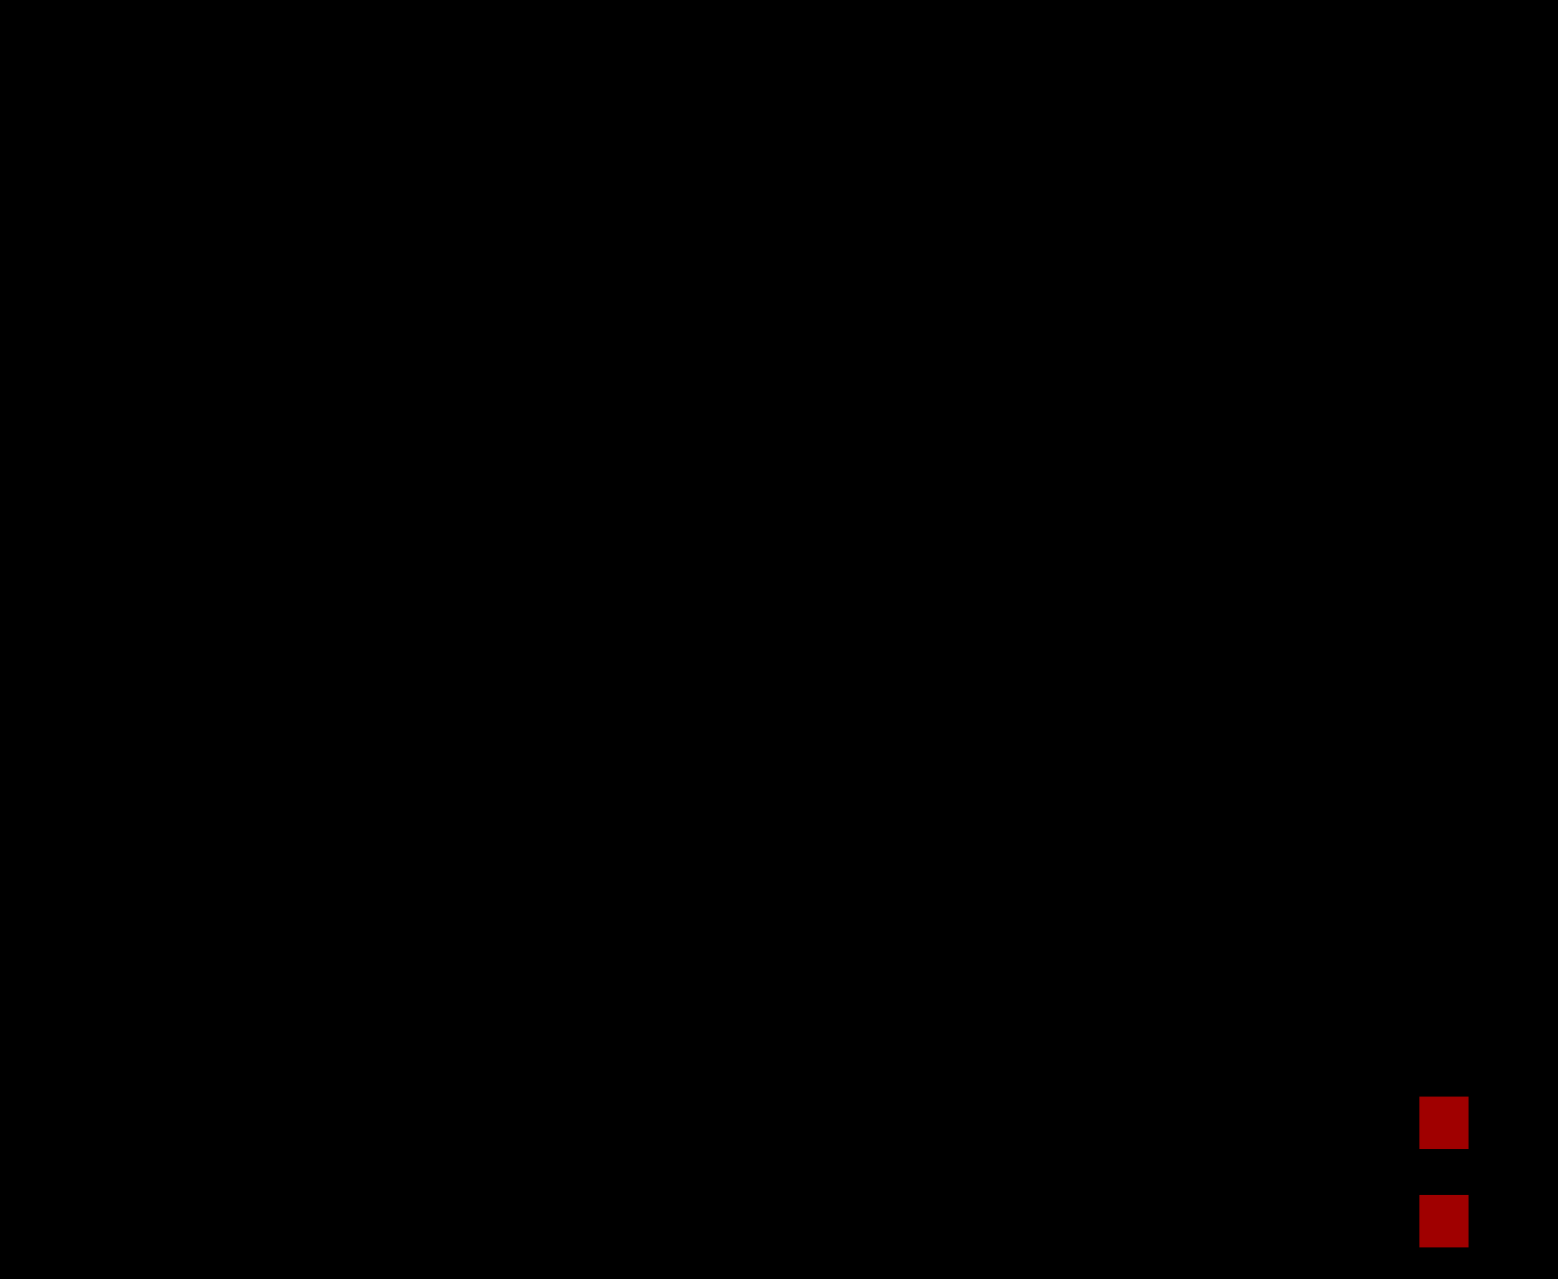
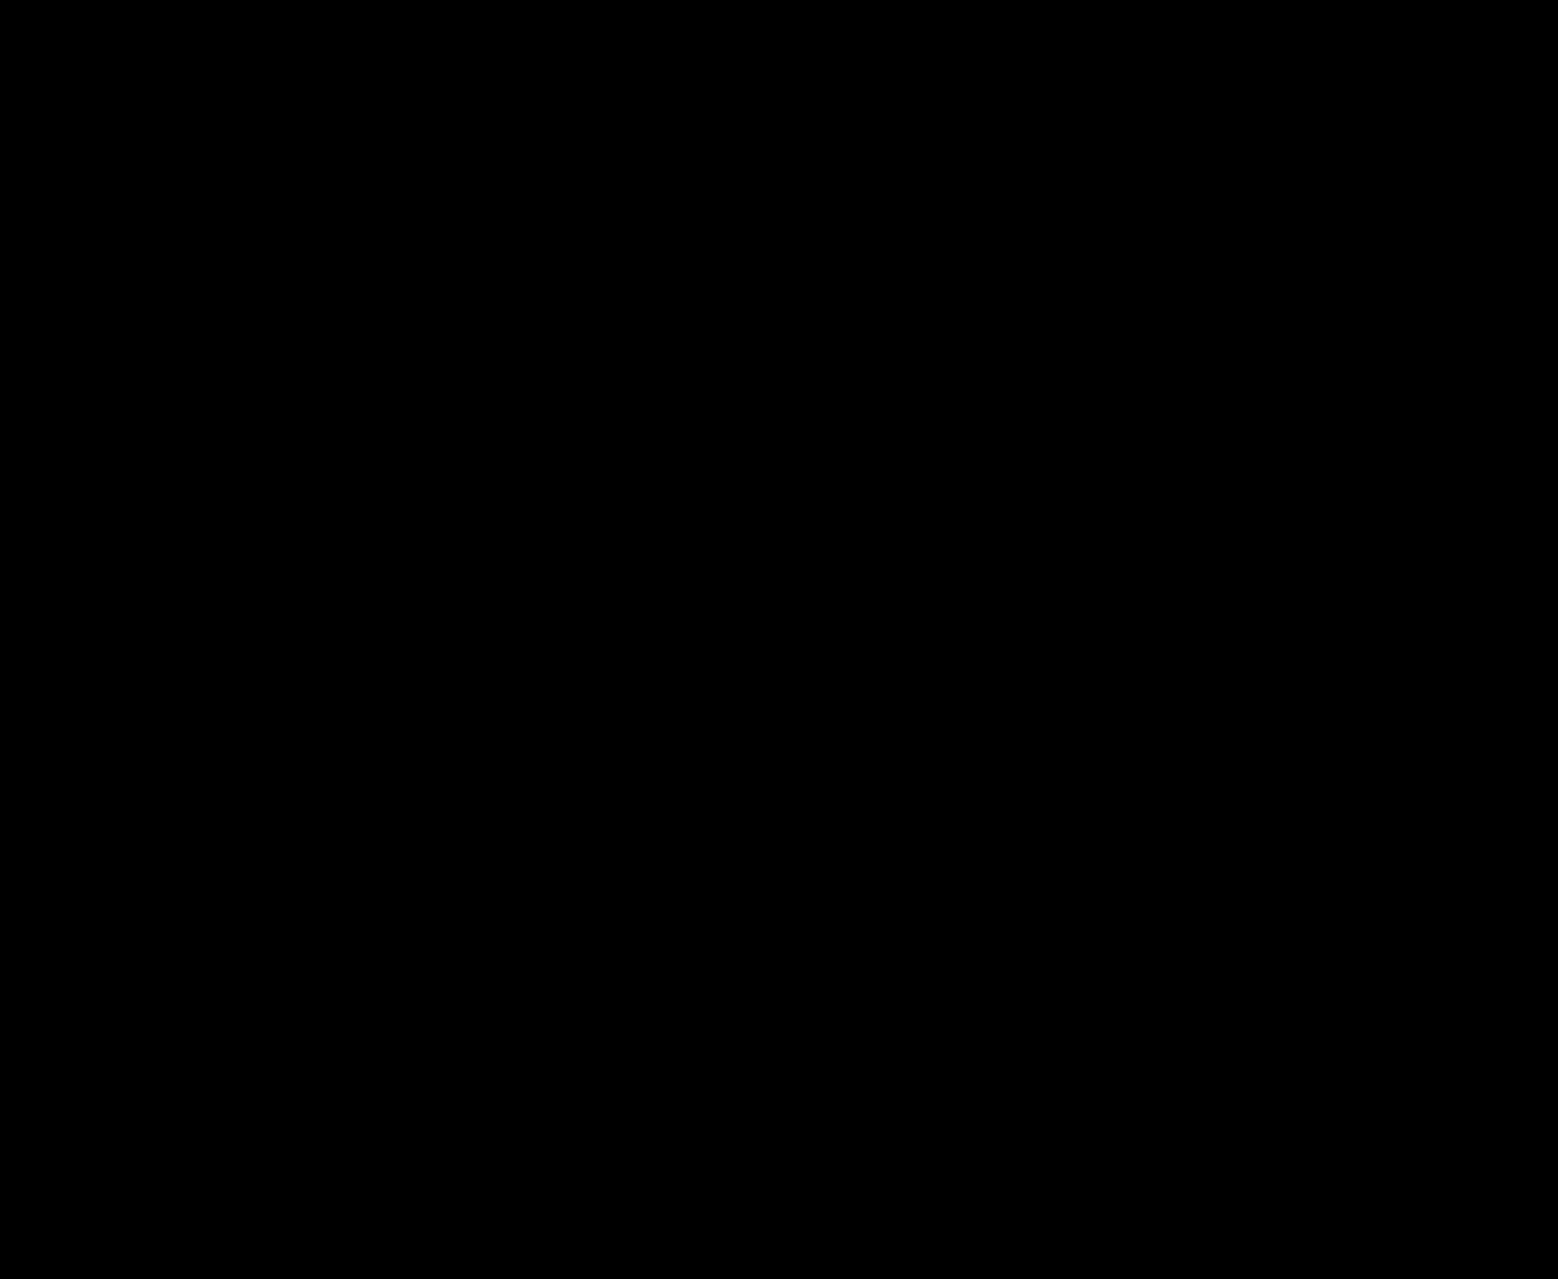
part: (1443, 1171) -> none

